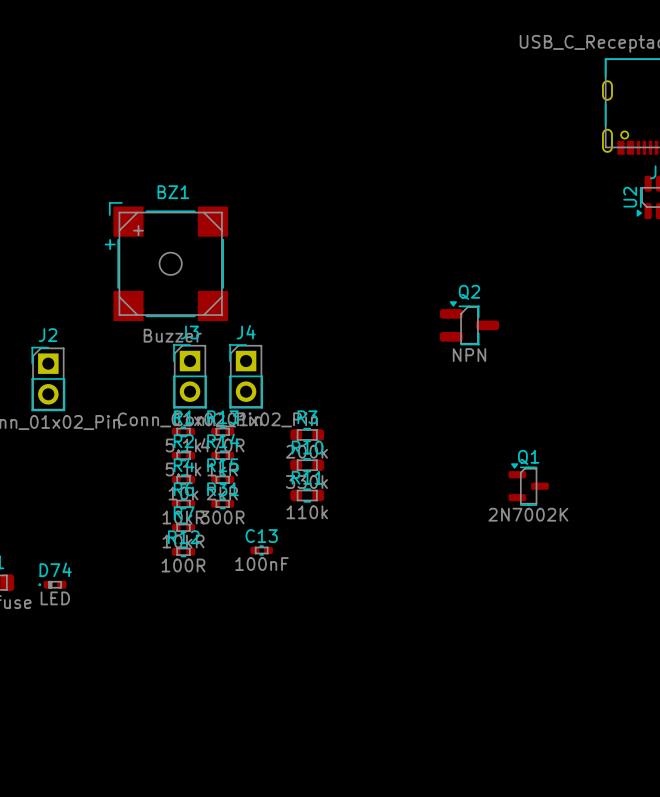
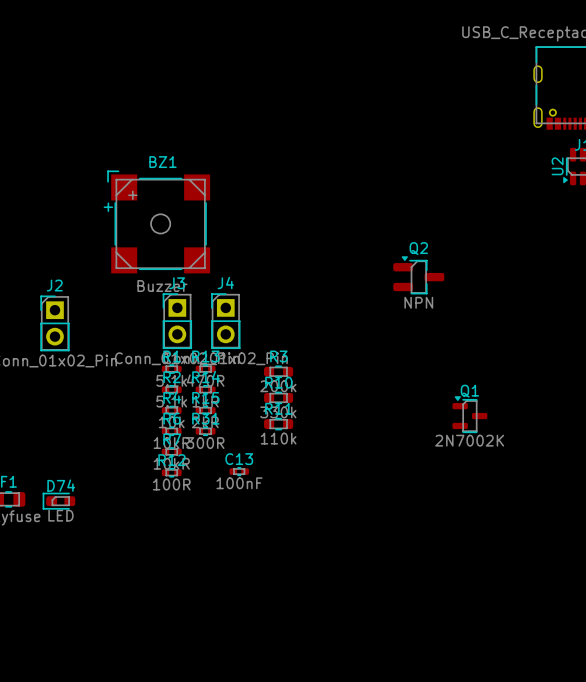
D74 footprint: [38, 580, 67, 589] -> [42, 492, 76, 510]

